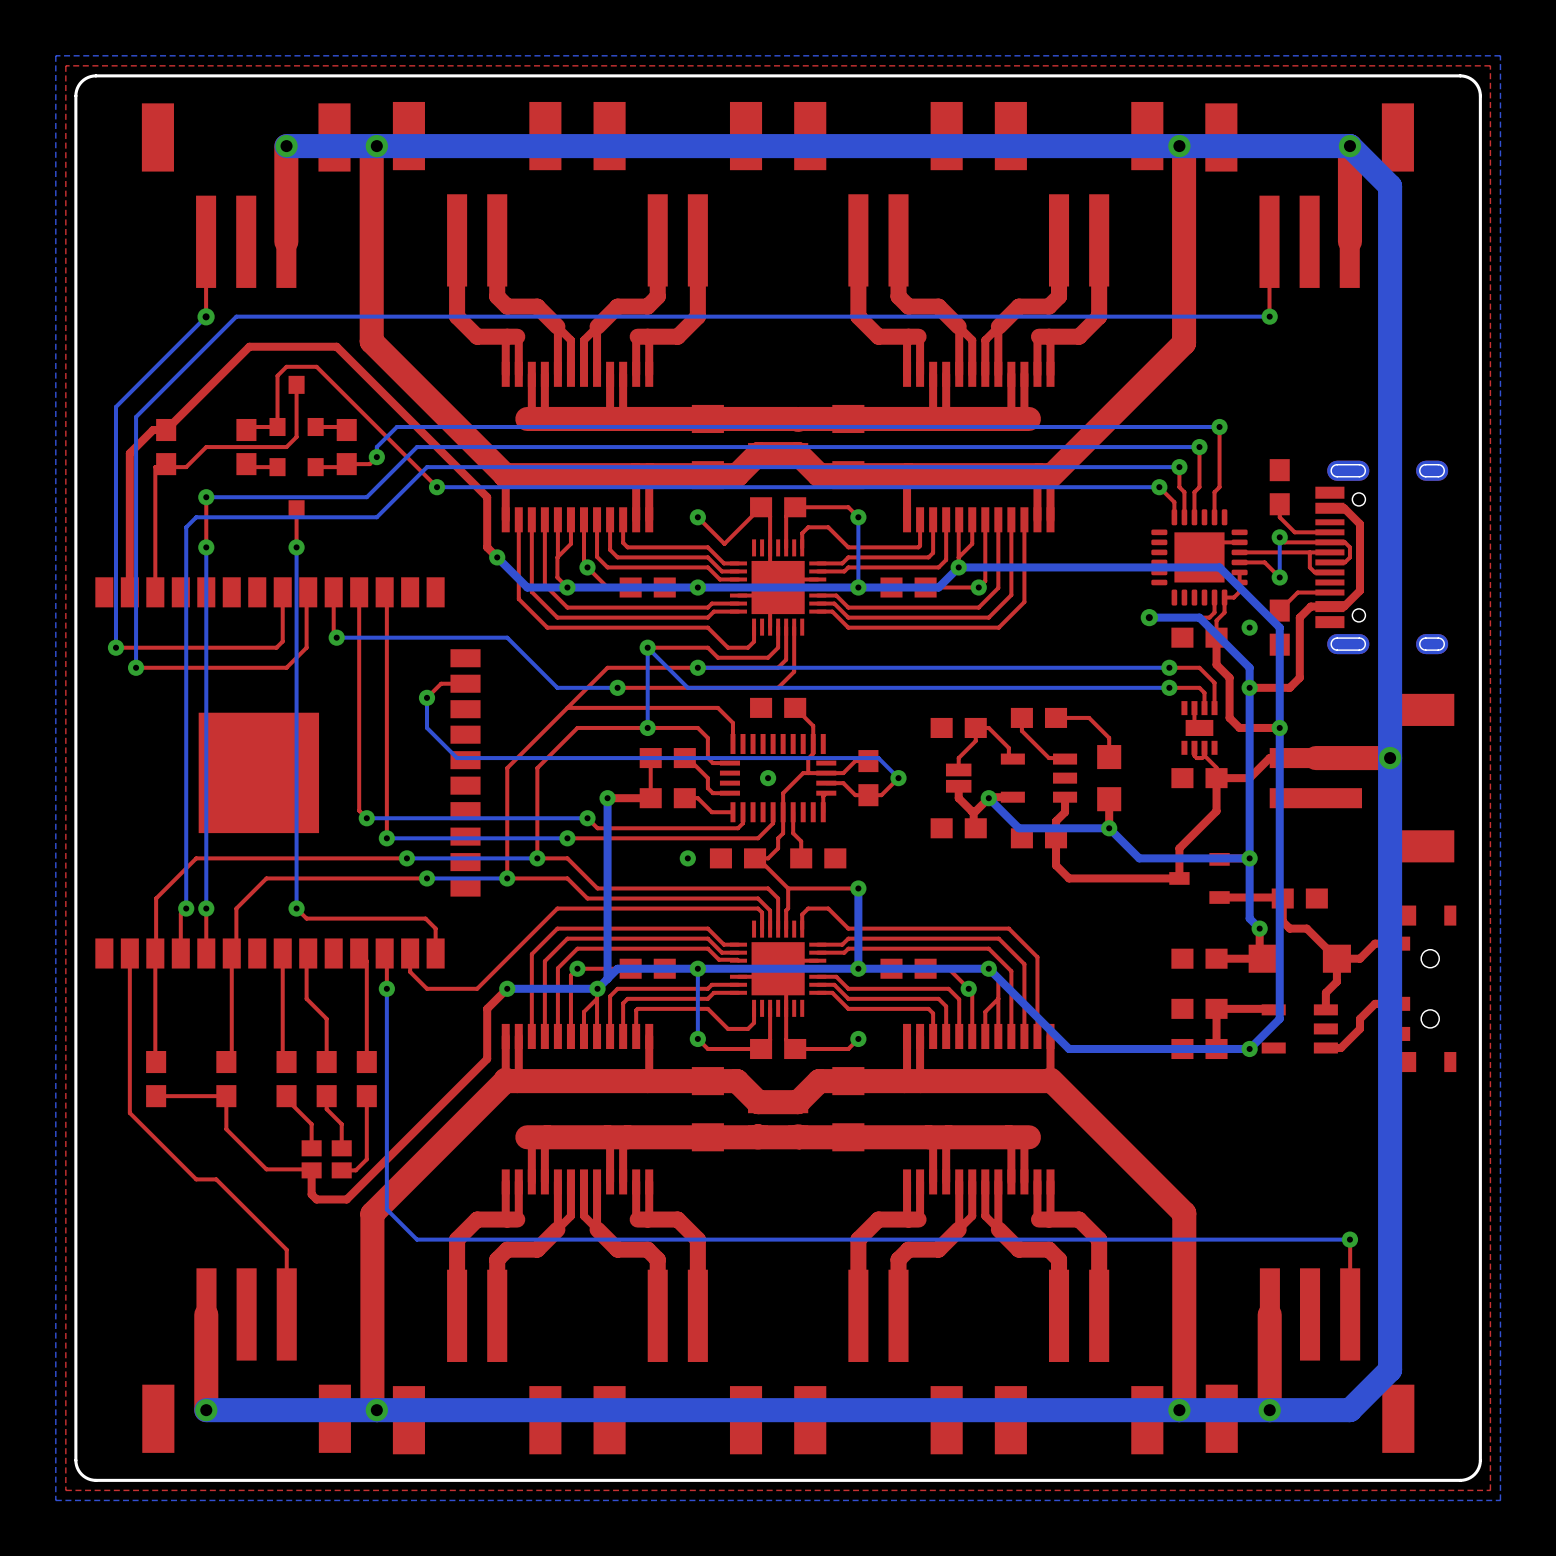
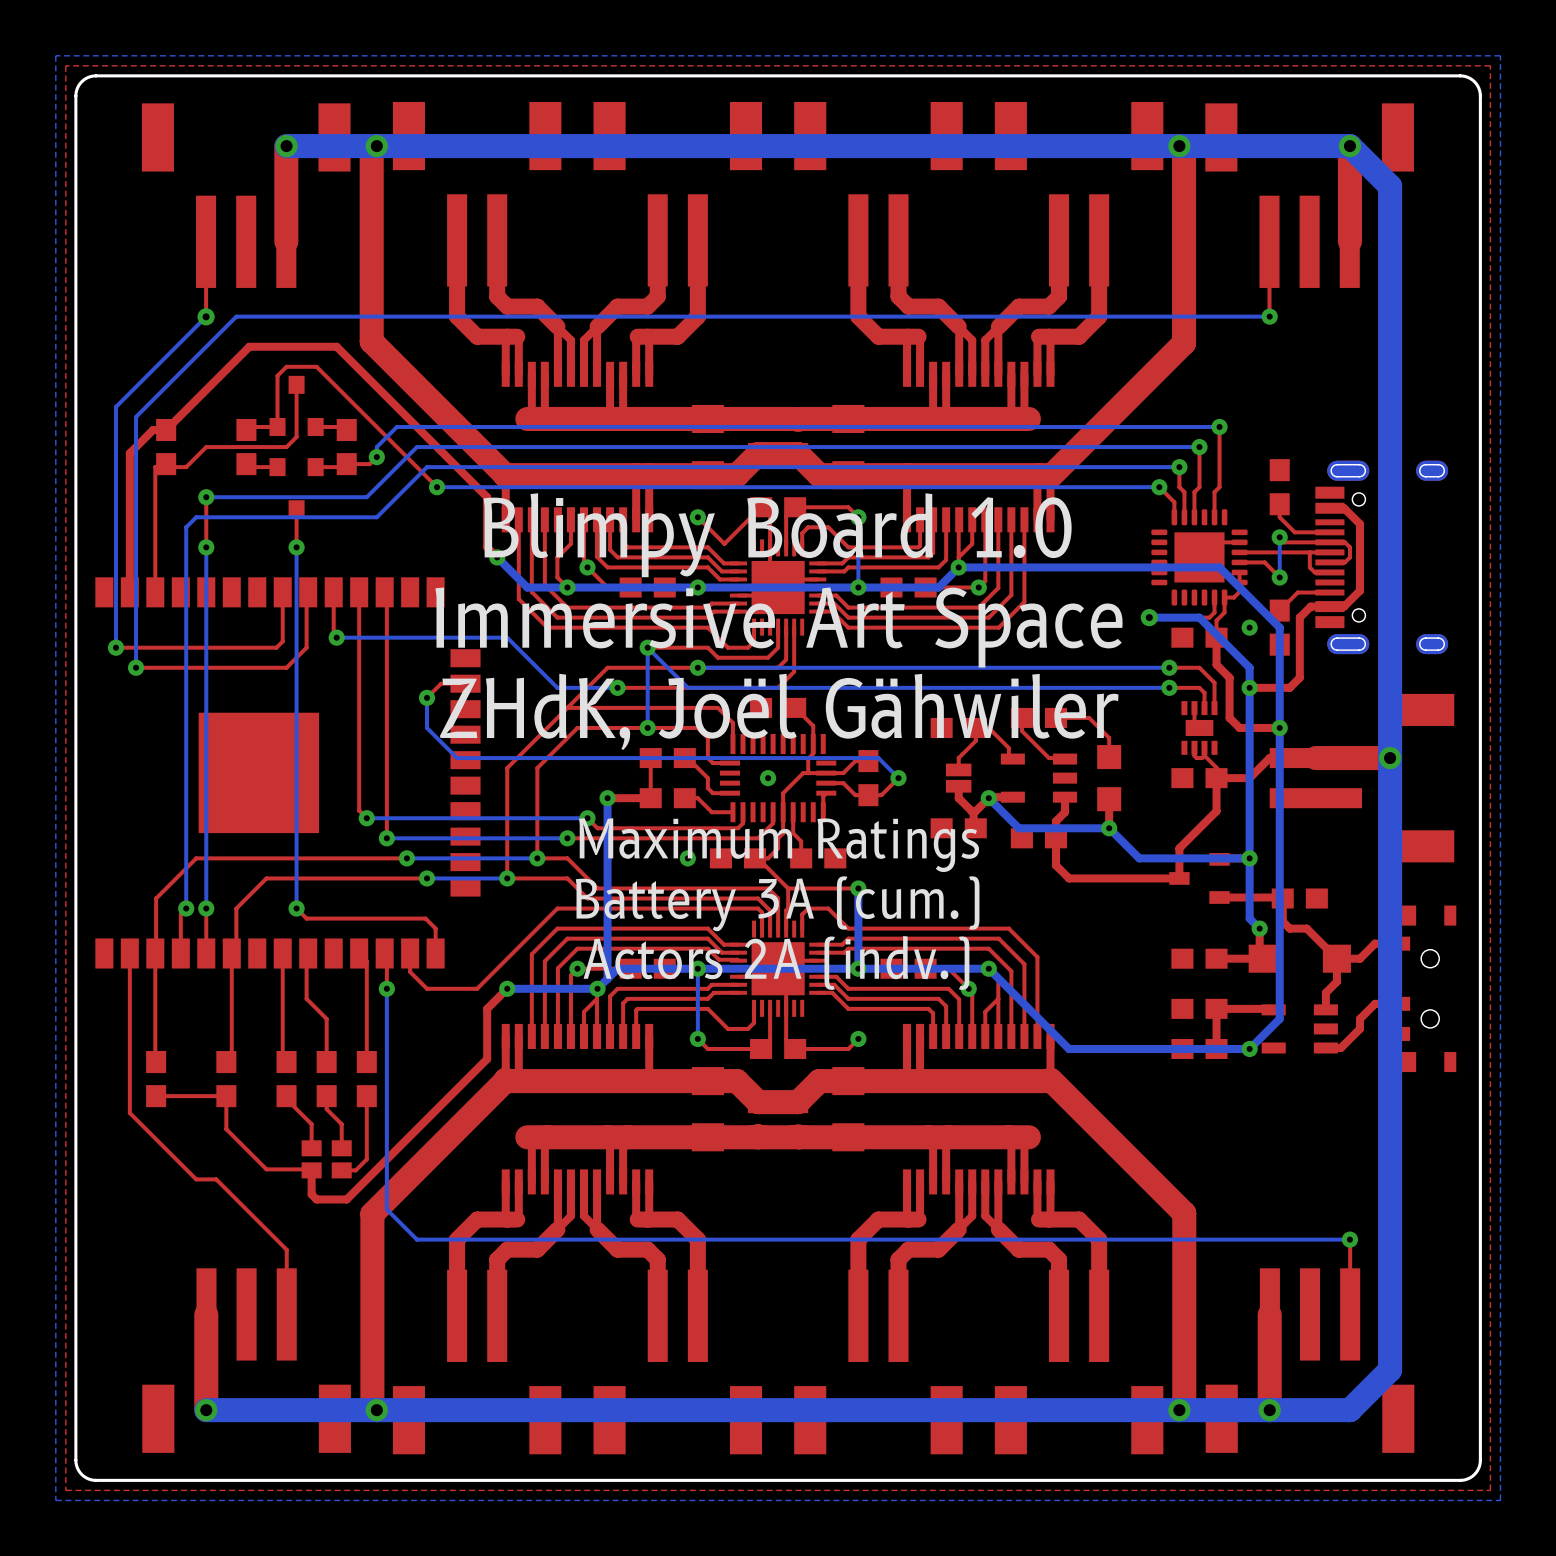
text: none -> Blimpy Board 1.0 (777, 535)
text: none -> Immersive Art Space (779, 627)
text: none -> ZHdK, Joël Gähwiler (779, 711)
text: none -> Maximum Ratings (779, 845)
text: none -> Battery 3A (cum.) (777, 903)
text: none -> Actors 2A (indv.) (776, 962)

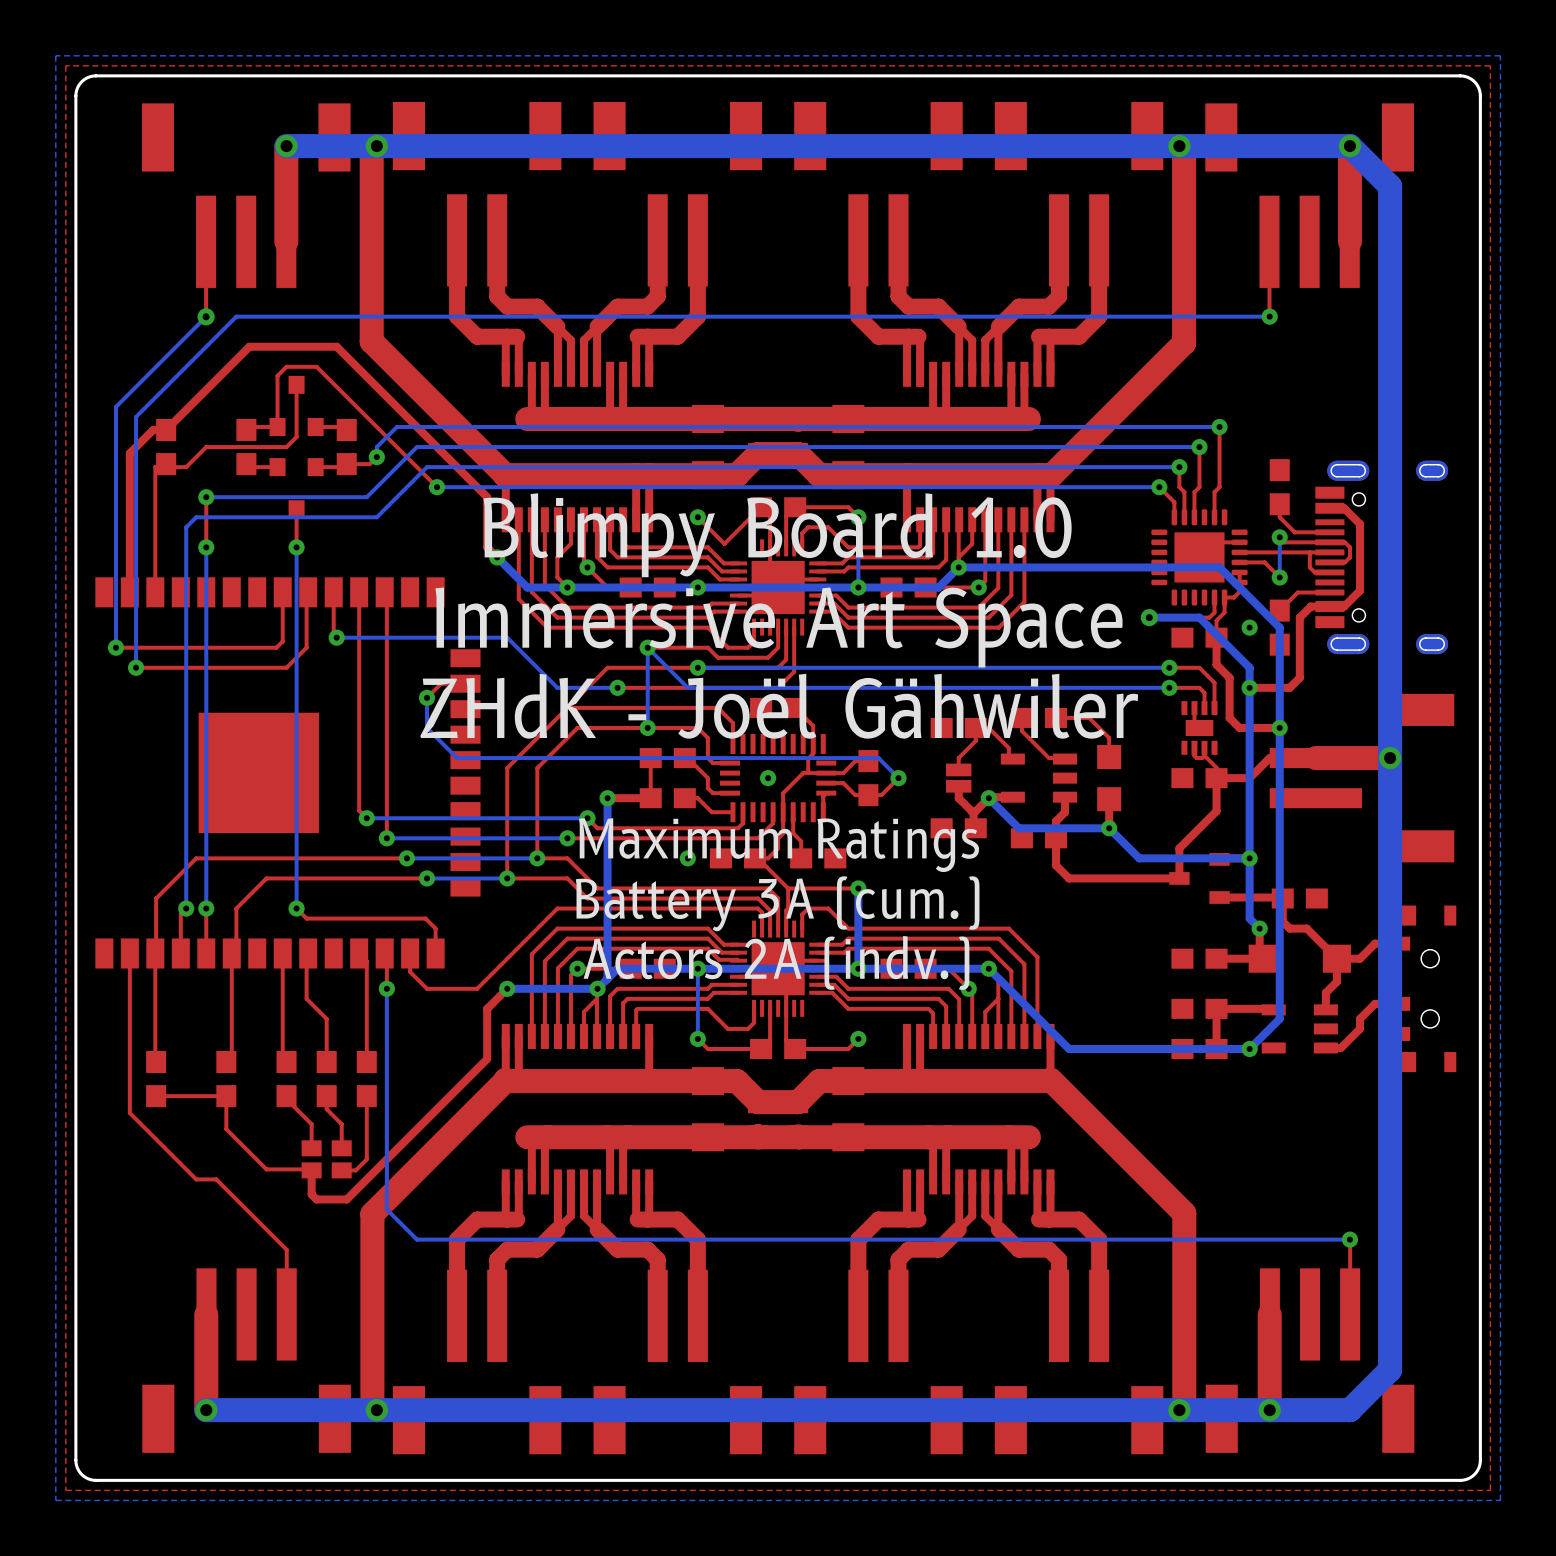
text: ZHdK, Joël Gähwiler (779, 711) -> ZHdK - Joël Gähwiler (779, 706)

